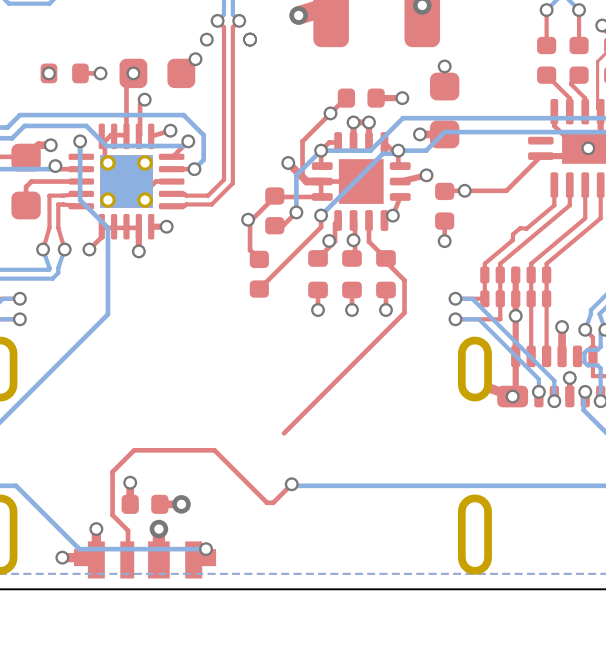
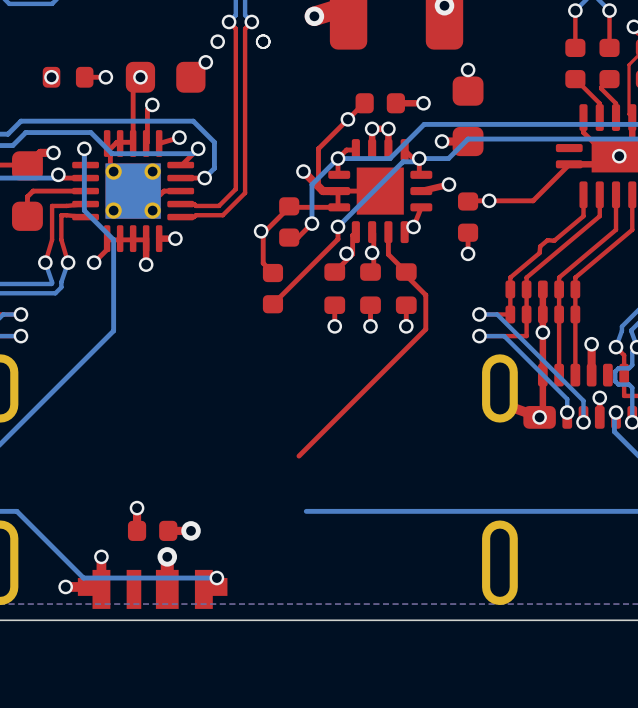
top track: (291, 484) (273, 502) (267, 502) (214, 450) (134, 450) (112, 471) (112, 515) (128, 530) (128, 558) -> none
via: (291, 484) -> none

